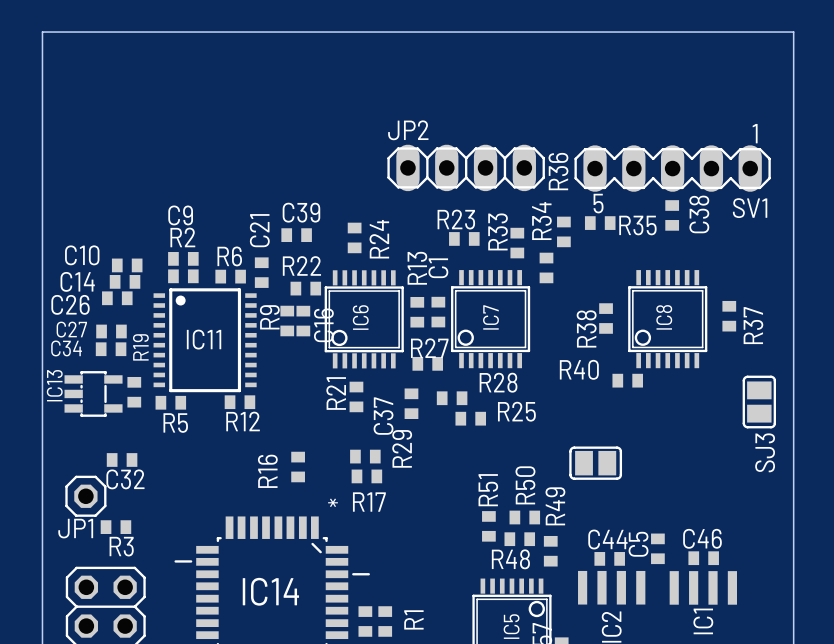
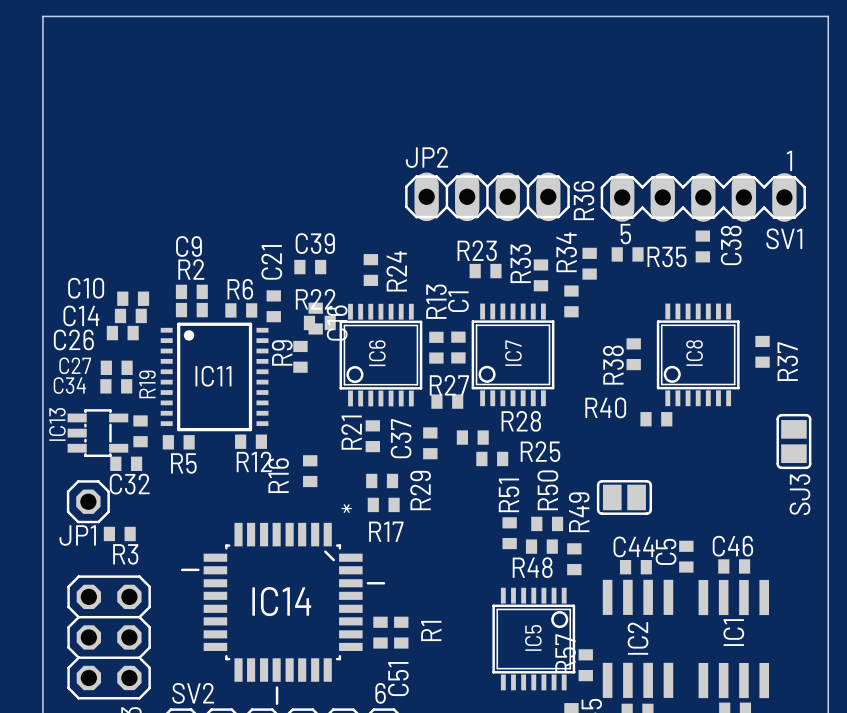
JP2 position: (466, 167) -> (487, 196)
SV1 position: (672, 168) -> (703, 197)
C38 position: (672, 215) -> (702, 246)
R35 position: (600, 223) -> (627, 254)
R36 position: (563, 231) -> (589, 263)
C39 position: (296, 235) -> (310, 267)
R24 position: (354, 237) -> (370, 270)
R23 position: (464, 238) -> (485, 271)
R33 position: (517, 243) -> (540, 275)
C9 position: (183, 258) -> (191, 291)
C10 position: (127, 265) -> (133, 298)
R34 position: (546, 267) -> (571, 301)
C21 position: (261, 272) -> (273, 306)
R2 position: (183, 276) -> (191, 310)
R6 position: (230, 276) -> (241, 310)
C14 position: (125, 281) -> (130, 315)
R22 position: (305, 288) -> (319, 322)
C26 position: (117, 298) -> (122, 333)
R13 position: (417, 312) -> (436, 347)
C1 position: (438, 312) -> (458, 347)
R37 position: (729, 316) -> (762, 351)
R38 position: (606, 318) -> (633, 354)
IC6 position: (364, 319) -> (380, 355)
IC7 position: (490, 319) -> (513, 354)
IC8 position: (667, 319) -> (698, 354)
R9 position: (287, 321) -> (300, 356)
C27 position: (111, 331) -> (116, 367)
IC11 position: (205, 340) -> (214, 376)
C34 position: (111, 349) -> (116, 386)
R27 position: (427, 363) -> (447, 401)
R40 position: (627, 380) -> (656, 419)
R19 position: (134, 392) -> (140, 431)
IC13 position: (93, 393) -> (97, 433)
R21 position: (356, 396) -> (372, 436)
R28 position: (452, 398) -> (472, 437)
R5 position: (170, 402) -> (178, 442)
R12 position: (239, 402) -> (251, 441)
SJ3 position: (759, 402) -> (793, 441)
R29 position: (411, 403) -> (430, 443)
R25 position: (470, 418) -> (492, 458)
C37: (365, 456) -> none
part position: (595, 463) -> (624, 497)
R17: none -> (383, 504)
R17 name: R17 (369, 502) -> C37 (401, 438)

